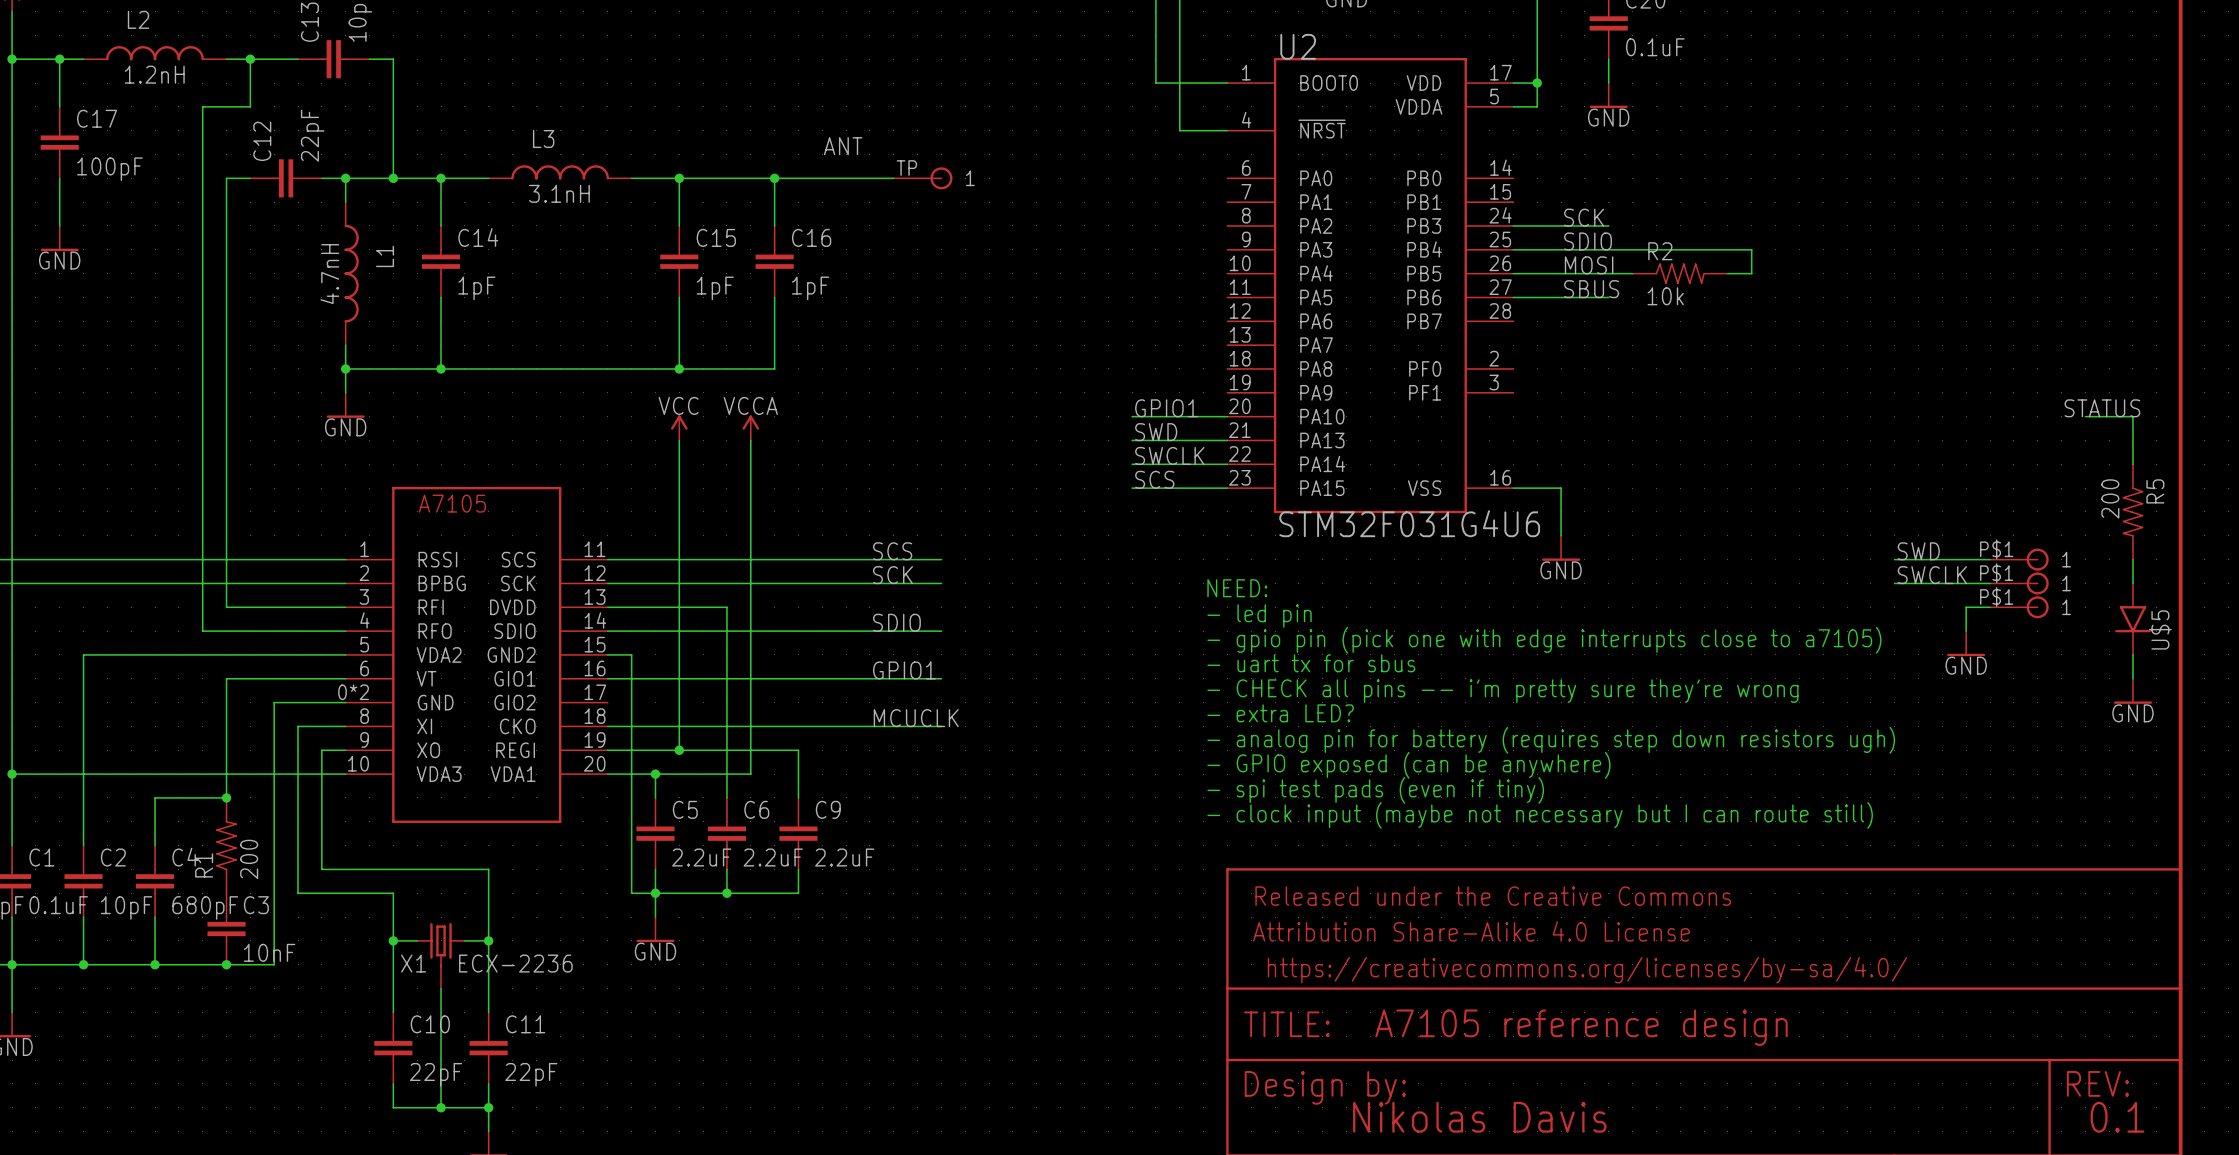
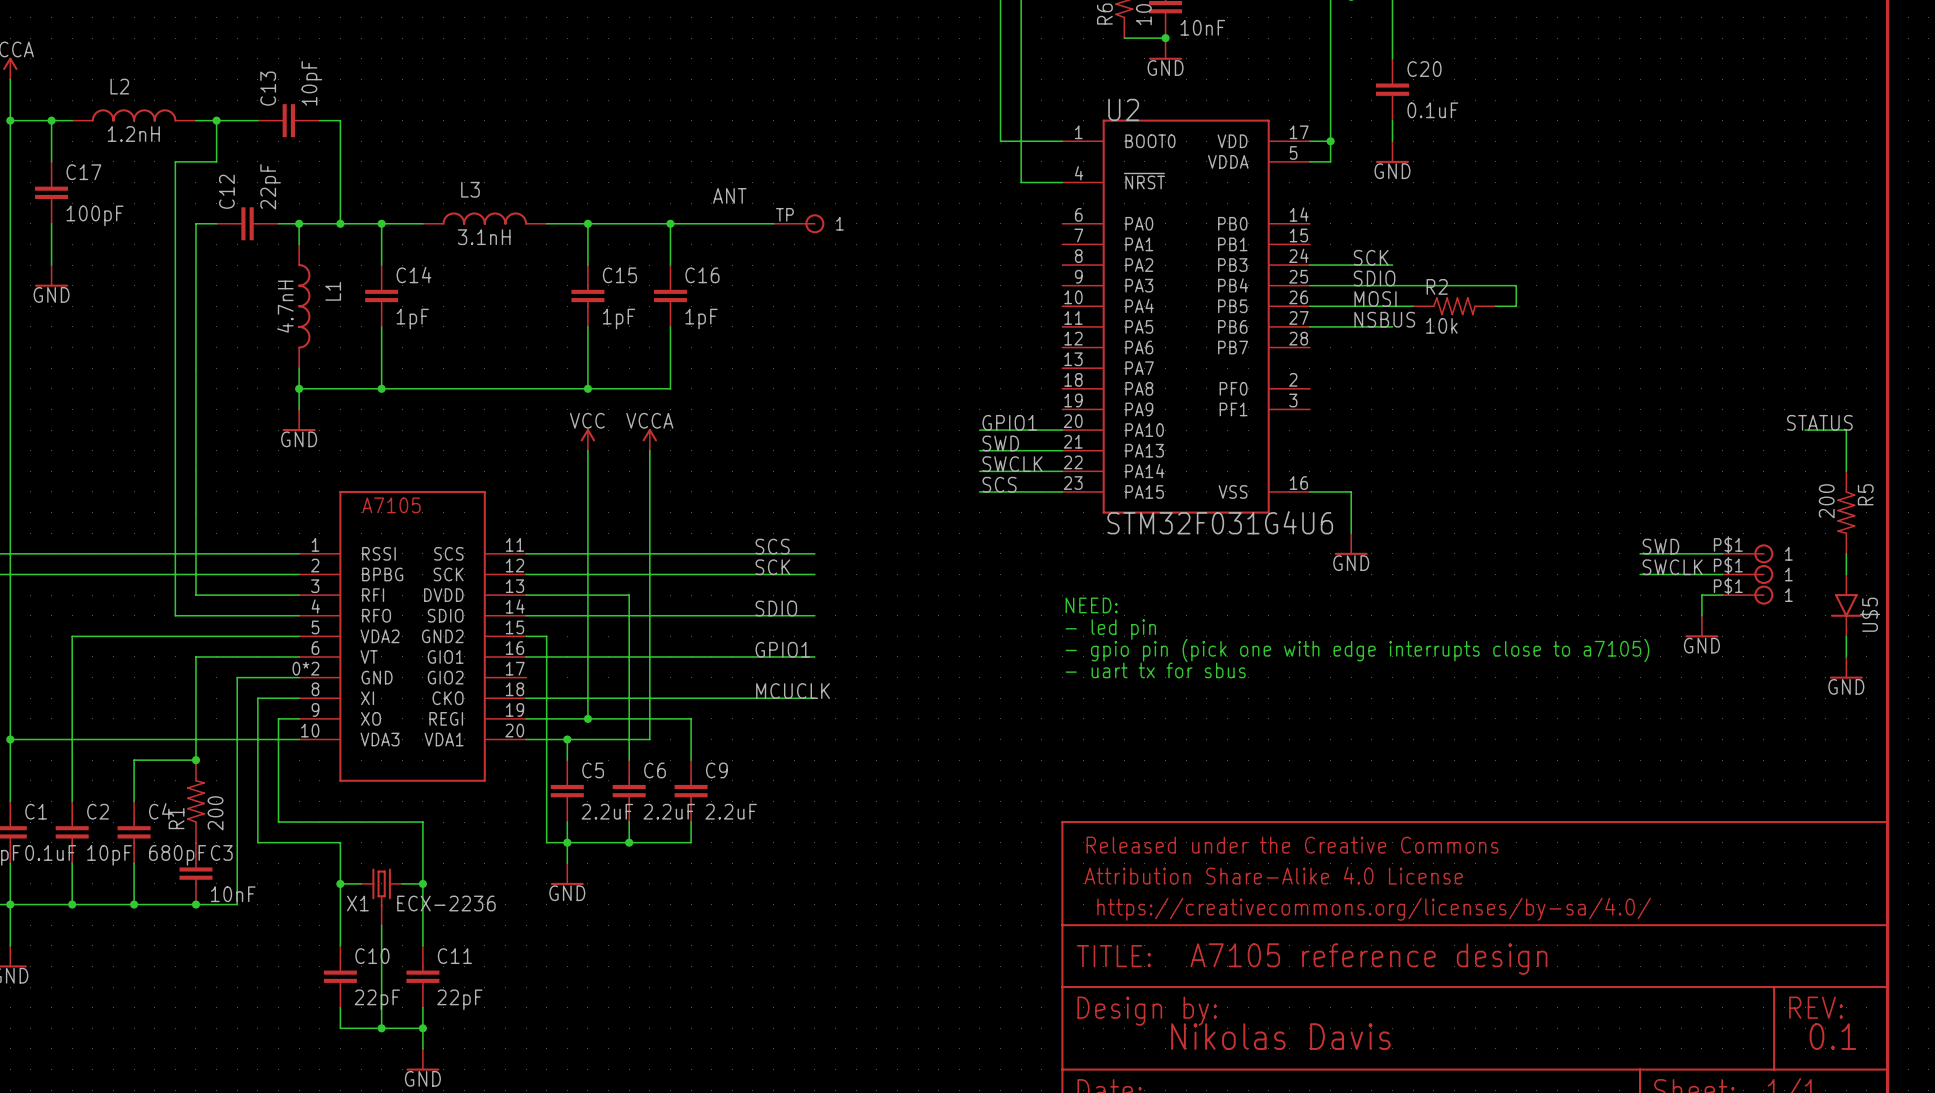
label: SBUS (1591, 289) -> NSBUS (1384, 319)
text position: NEED: (1237, 588) -> NEED: (1091, 605)
text position: - led pin (1259, 616) -> - led pin (1110, 629)
text position: - gpio pin (pick one with edge interrupts close to a7105) (1544, 640) -> - gpio pin (pick one with edge interrupts close to a7105) (1357, 650)
text position: - uart tx for sbus (1311, 663) -> - uart tx for sbus (1155, 670)
text: - CHECK all pins -- i'm pretty sure they're wrong (1502, 691) -> none
text: - extra LED? (1280, 713) -> none
text: - analog pin for battery (requires step down resistors ugh) (1551, 740) -> none
text: - GPIO exposed (can be anywhere) (1408, 765) -> none
text: - spi test pads (even if tiny) (1375, 790) -> none
text: - clock input (maybe not necessary but I can route still) (1540, 815) -> none

